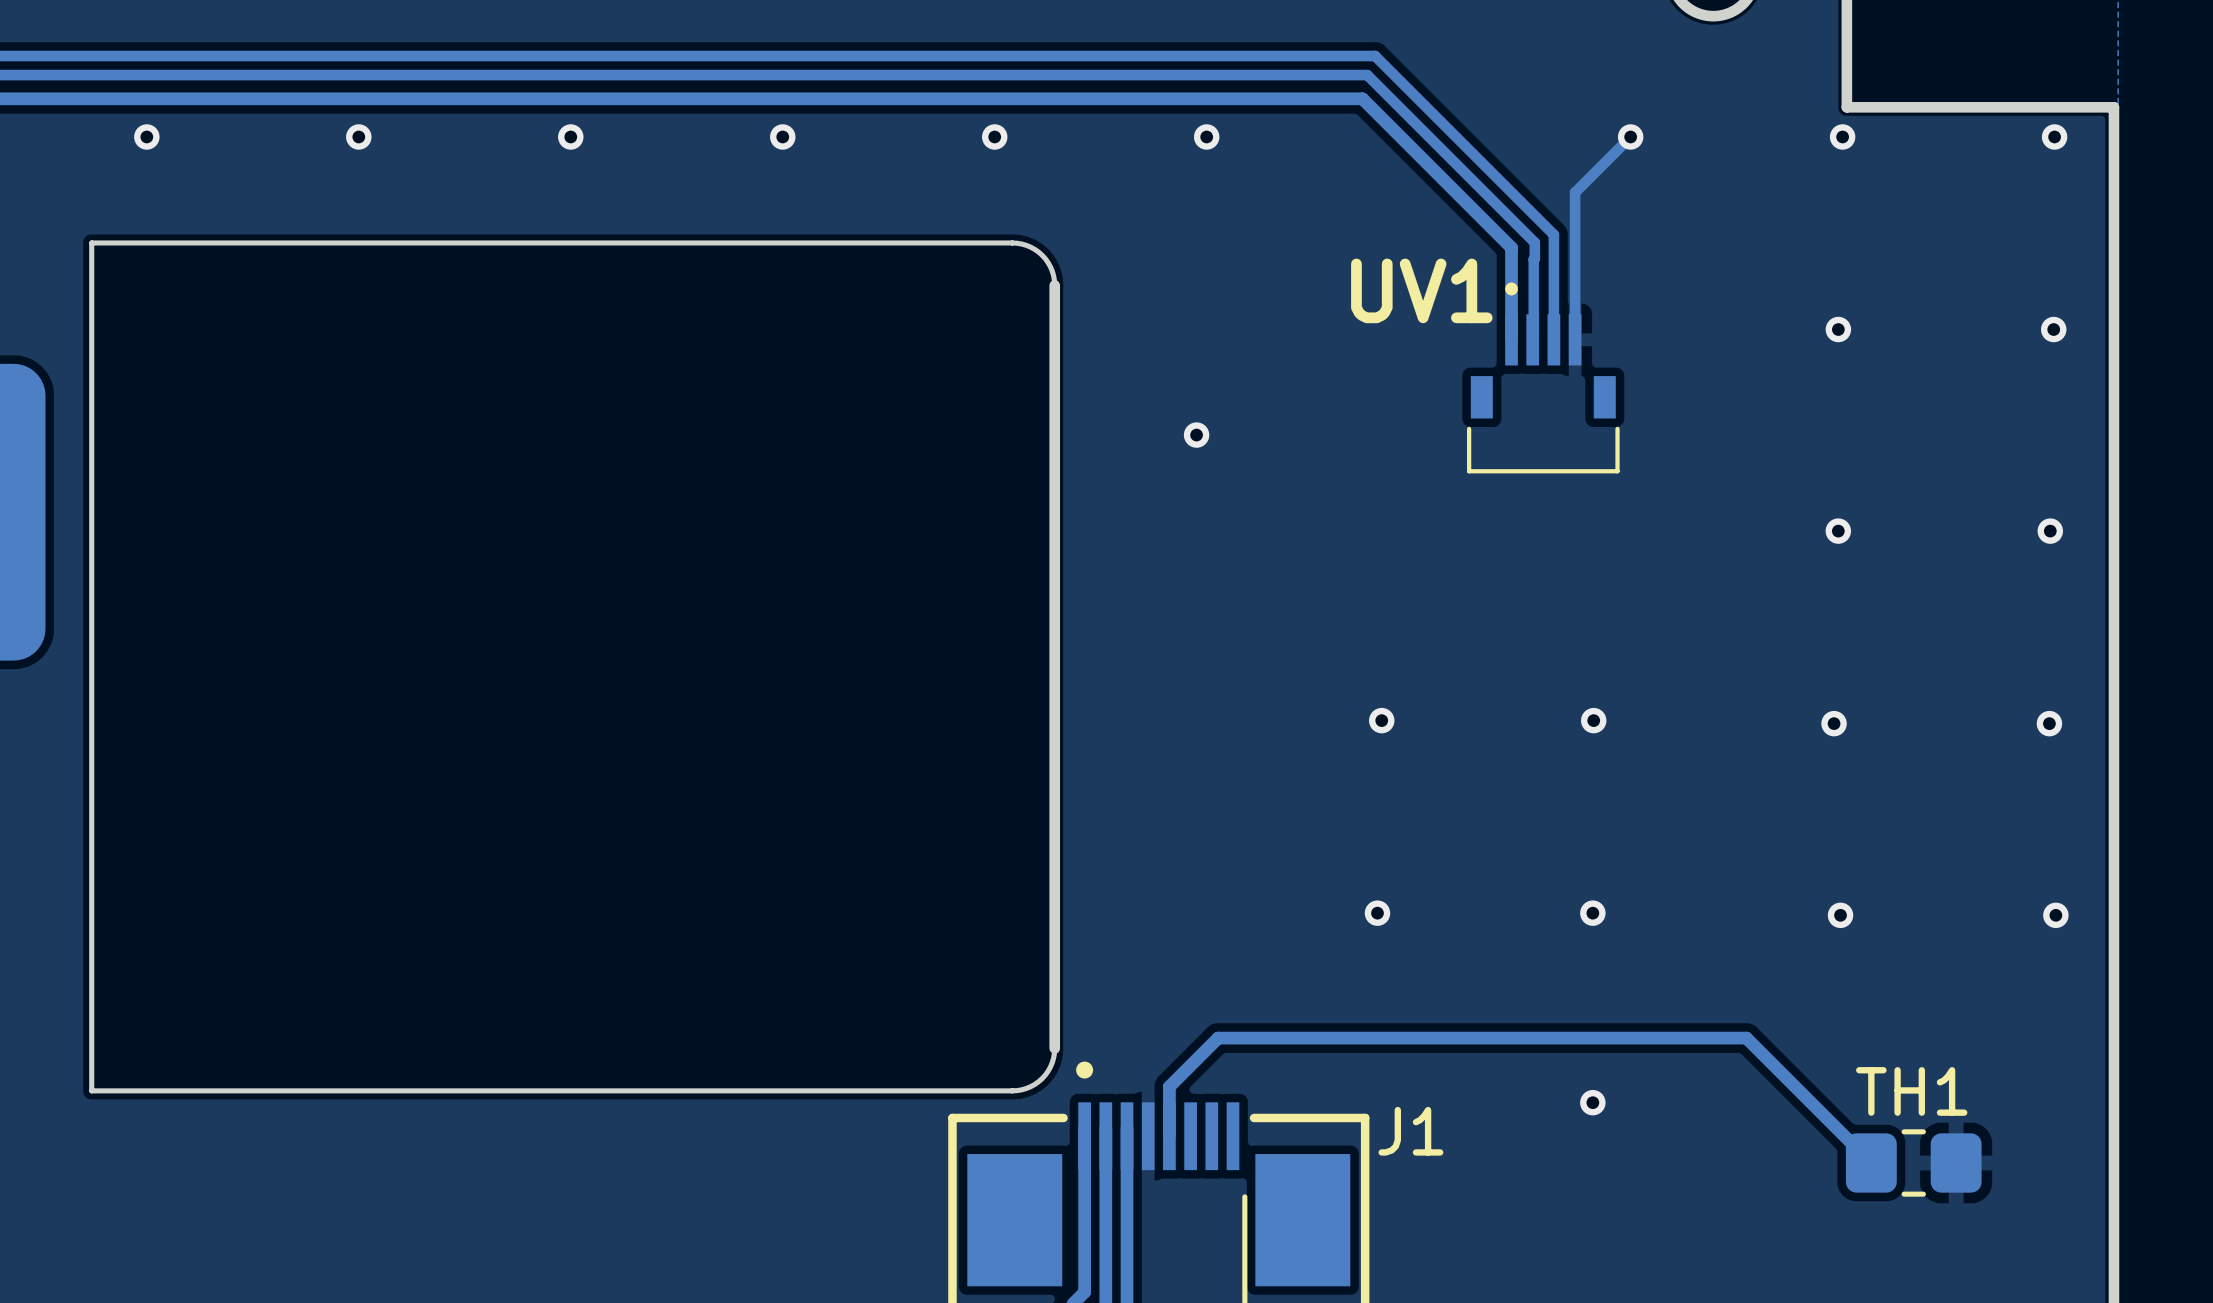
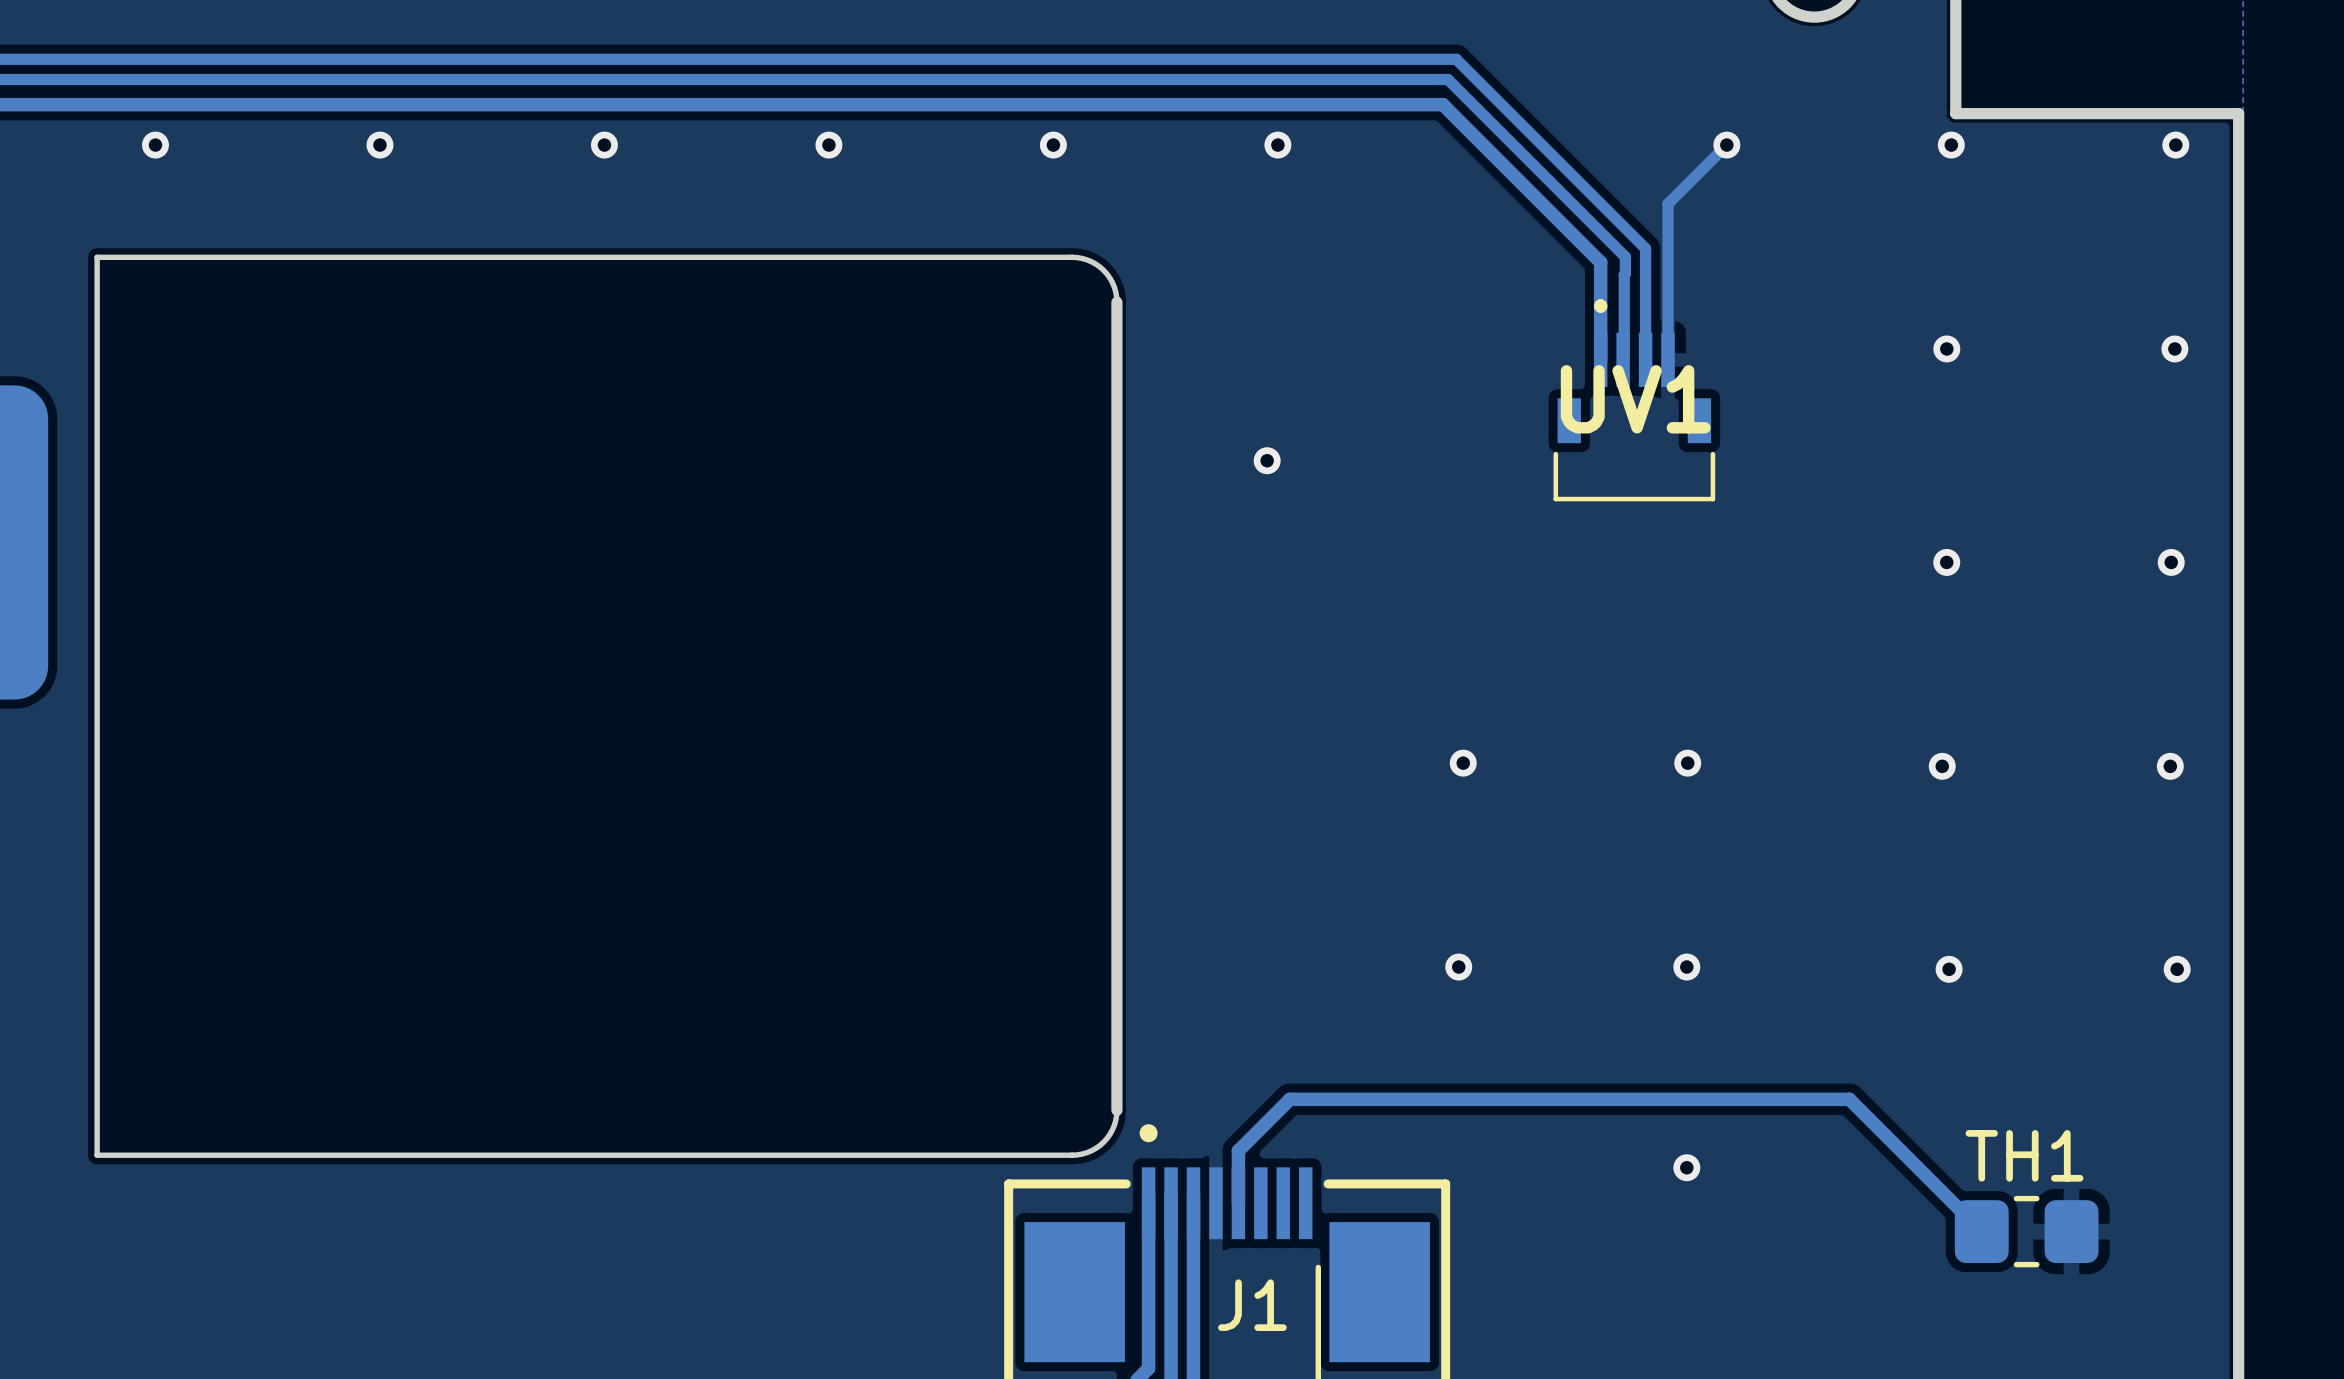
UV1 name position: UV1 (1421, 290) -> UV1 (1635, 399)
J1 name position: J1 (1410, 1131) -> J1 (1252, 1305)

